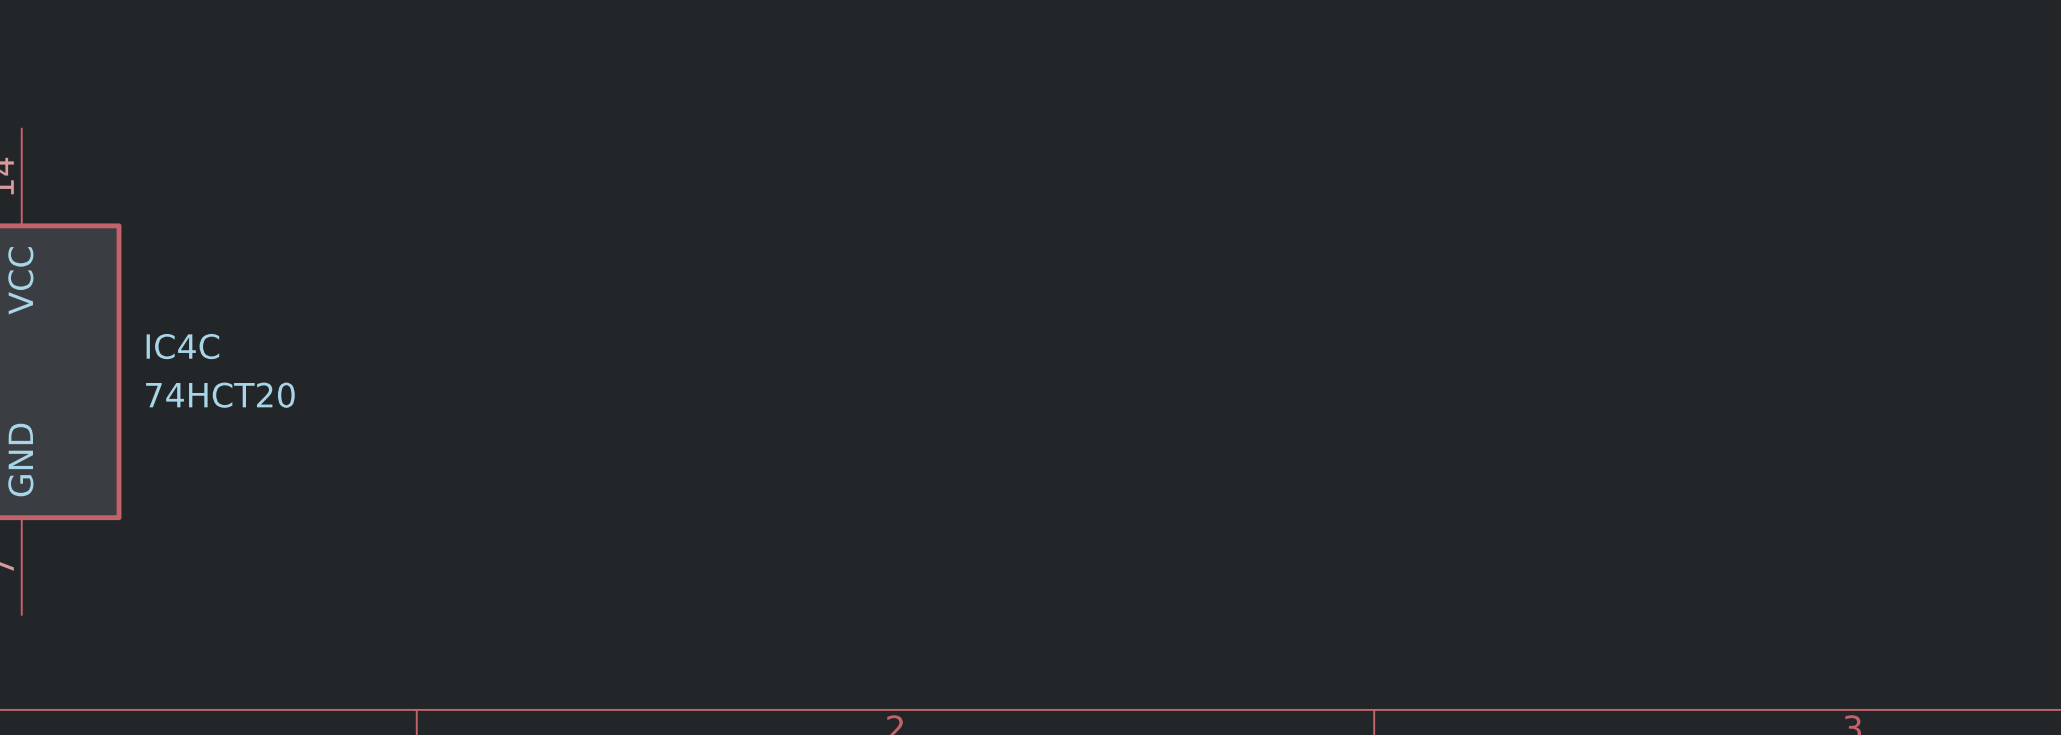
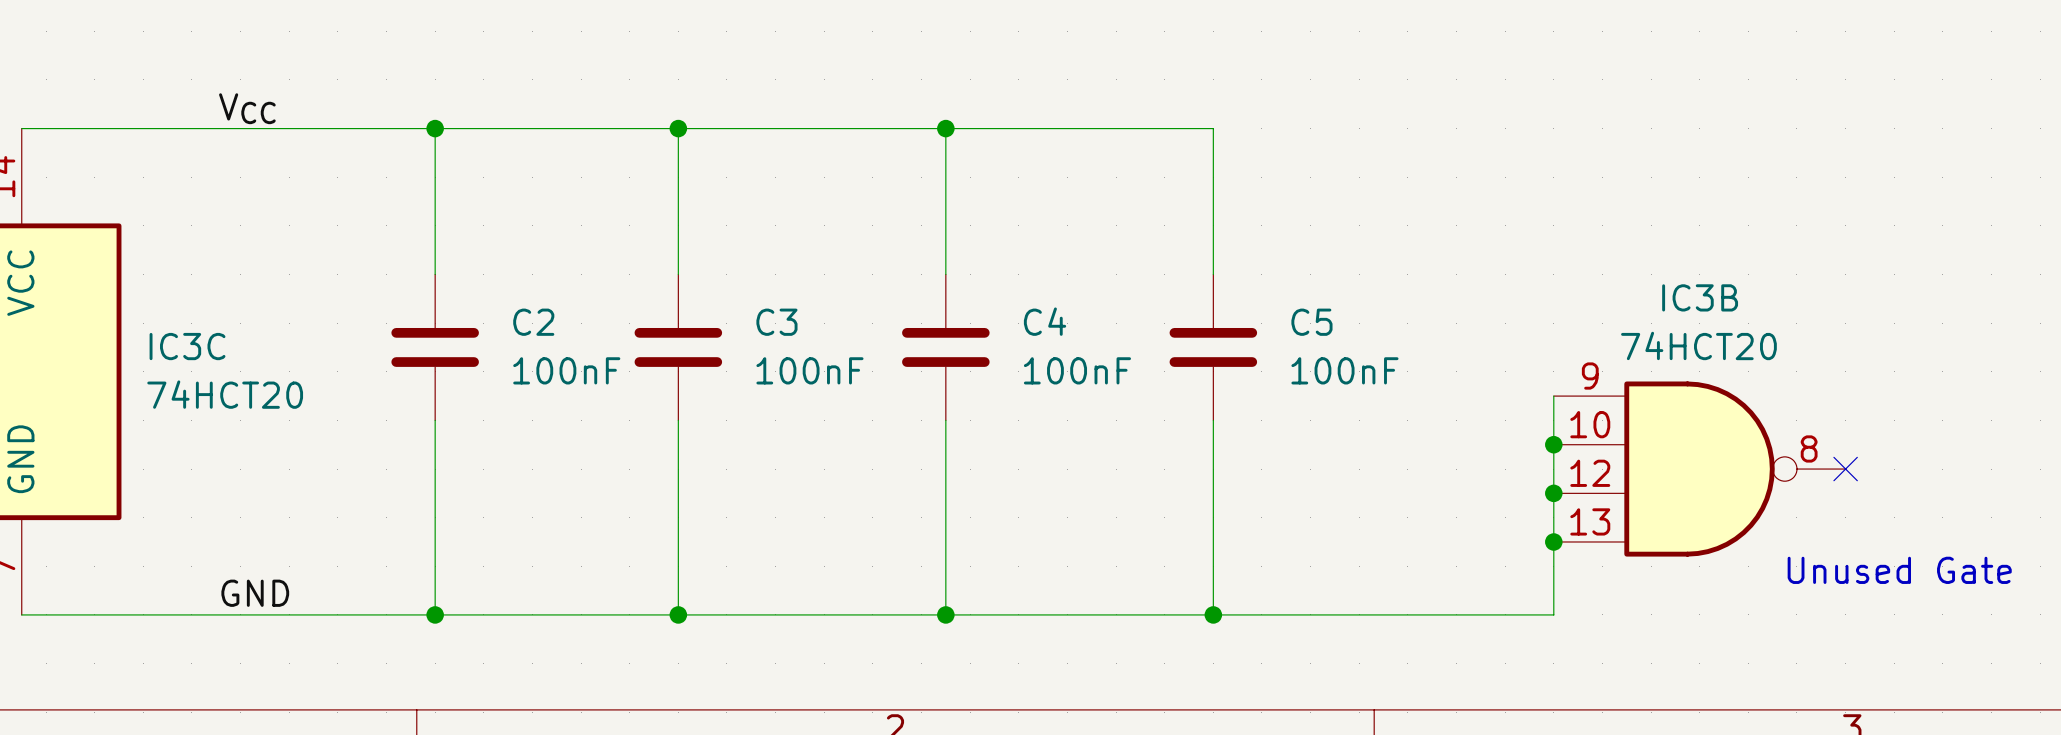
label: none -> VCC (247, 108)
wire: none -> (21, 128) (1213, 128) (1213, 274)
wire: none -> (435, 128) (435, 274)
junction: none -> (435, 128)
wire: none -> (678, 128) (678, 274)
junction: none -> (678, 128)
wire: none -> (945, 128) (945, 274)
junction: none -> (945, 128)
IC4C name: IC4C (182, 346) -> IC3C (187, 346)
C2: none -> 100nF (435, 347)
C3: none -> 100nF (678, 347)
C4: none -> 100nF (945, 347)
C5: none -> 100nF (1213, 347)
wire: none -> (1553, 396) (1553, 614) (21, 614)
wire: none -> (435, 420) (435, 614)
wire: none -> (678, 420) (678, 614)
wire: none -> (945, 420) (945, 614)
wire: none -> (1213, 420) (1213, 614)
junction: none -> (1553, 444)
IC3B: none -> 74HCT20 (1699, 469)
no-connect mark: none -> (1845, 469)
junction: none -> (1553, 493)
junction: none -> (1553, 541)
text: none -> Unused Gate (1899, 570)
label: none -> GND (255, 593)
junction: none -> (435, 614)
junction: none -> (678, 614)
junction: none -> (945, 614)
junction: none -> (1213, 614)

